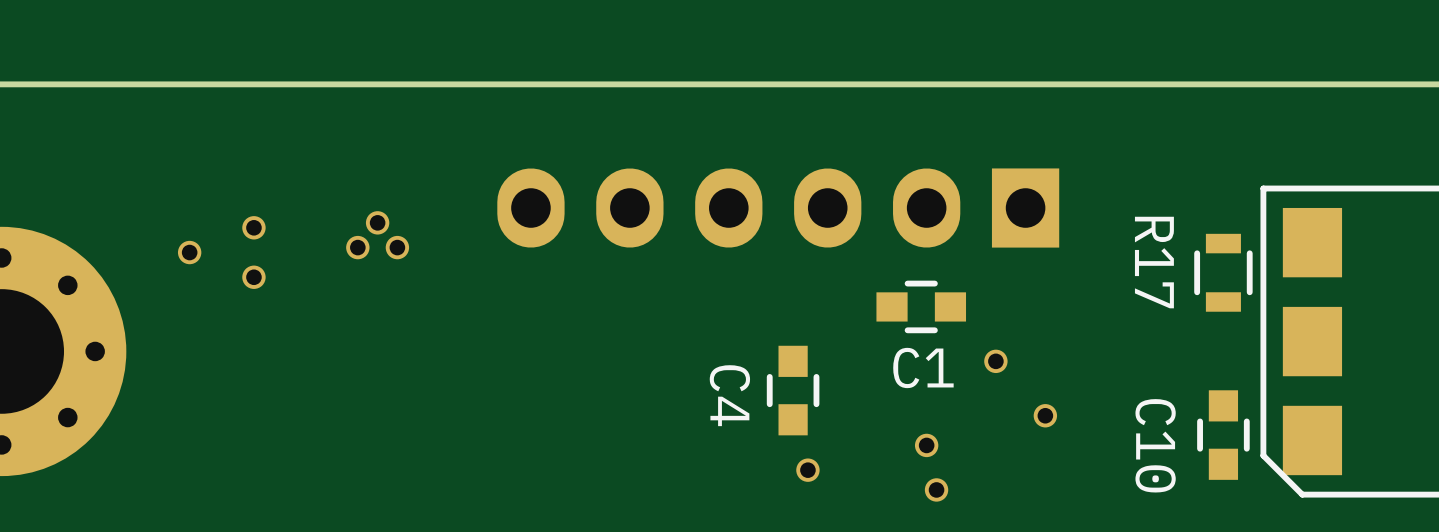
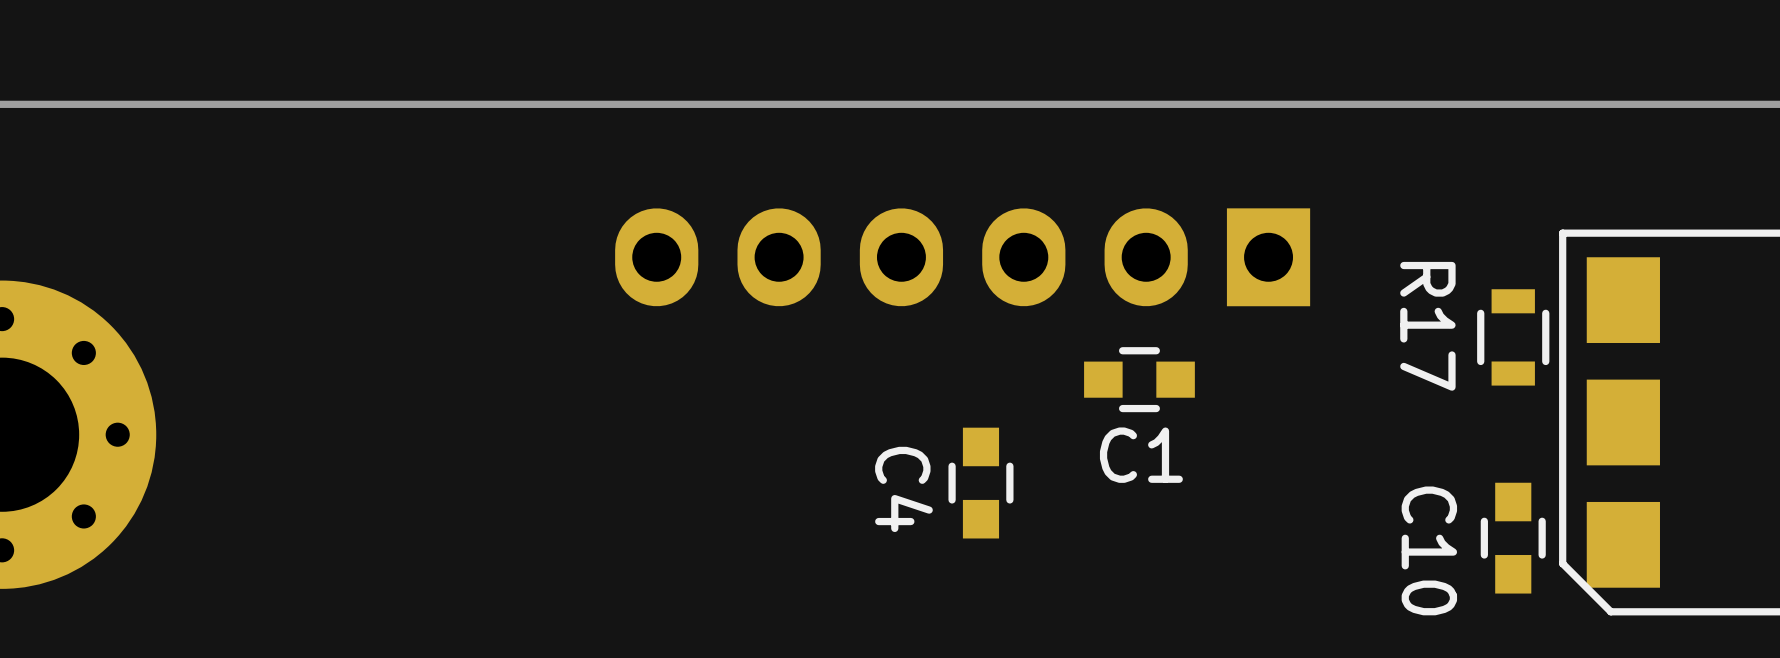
part: (377, 222) -> none
part: (253, 227) -> none
part: (357, 247) -> none
part: (397, 247) -> none
part: (189, 252) -> none
part: (253, 277) -> none
part: (995, 361) -> none
part: (1045, 415) -> none
part: (926, 445) -> none
part: (807, 470) -> none
part: (936, 489) -> none

